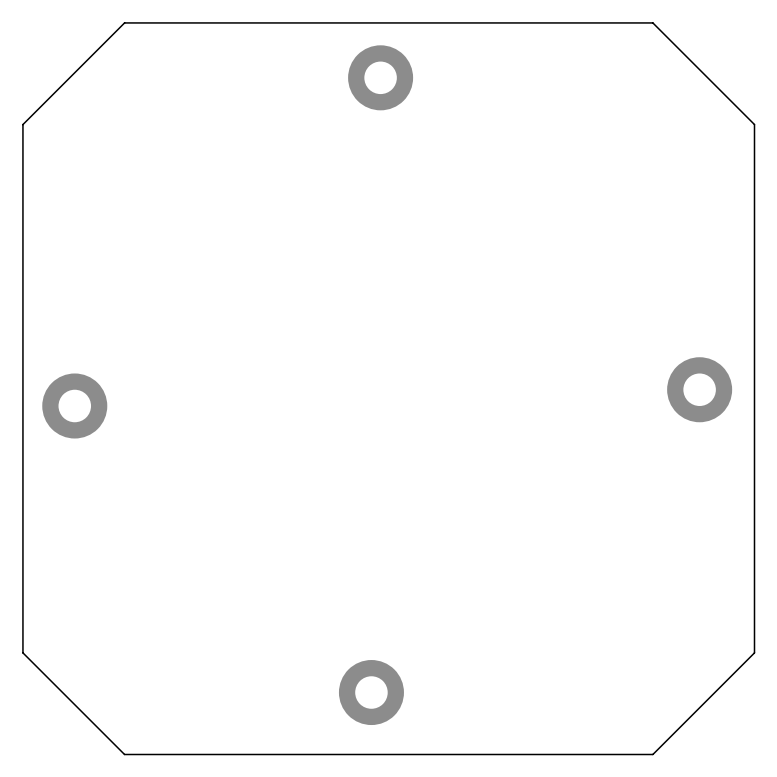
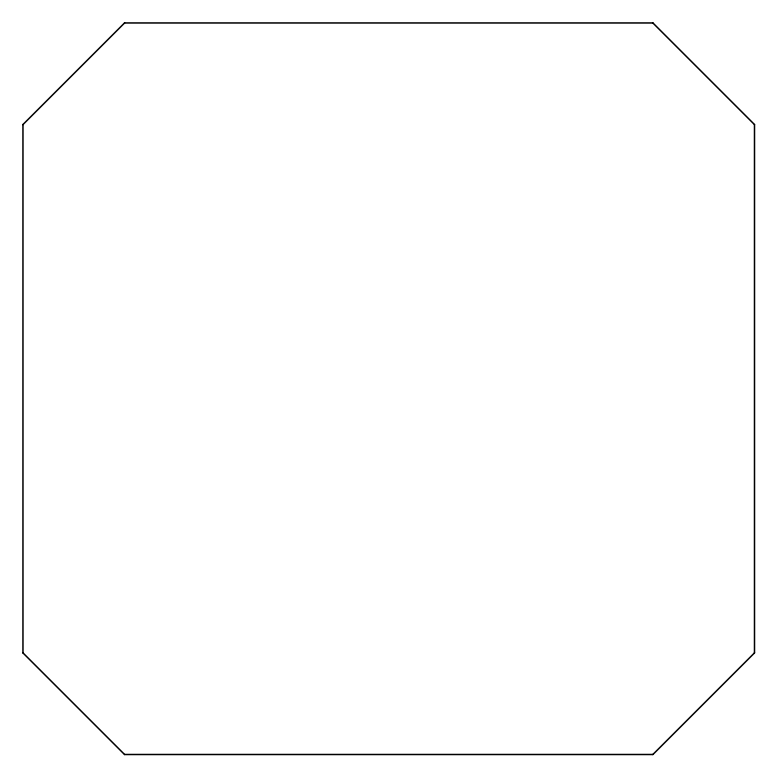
part: (380, 77) -> none
part: (699, 389) -> none
part: (74, 406) -> none
part: (371, 692) -> none

